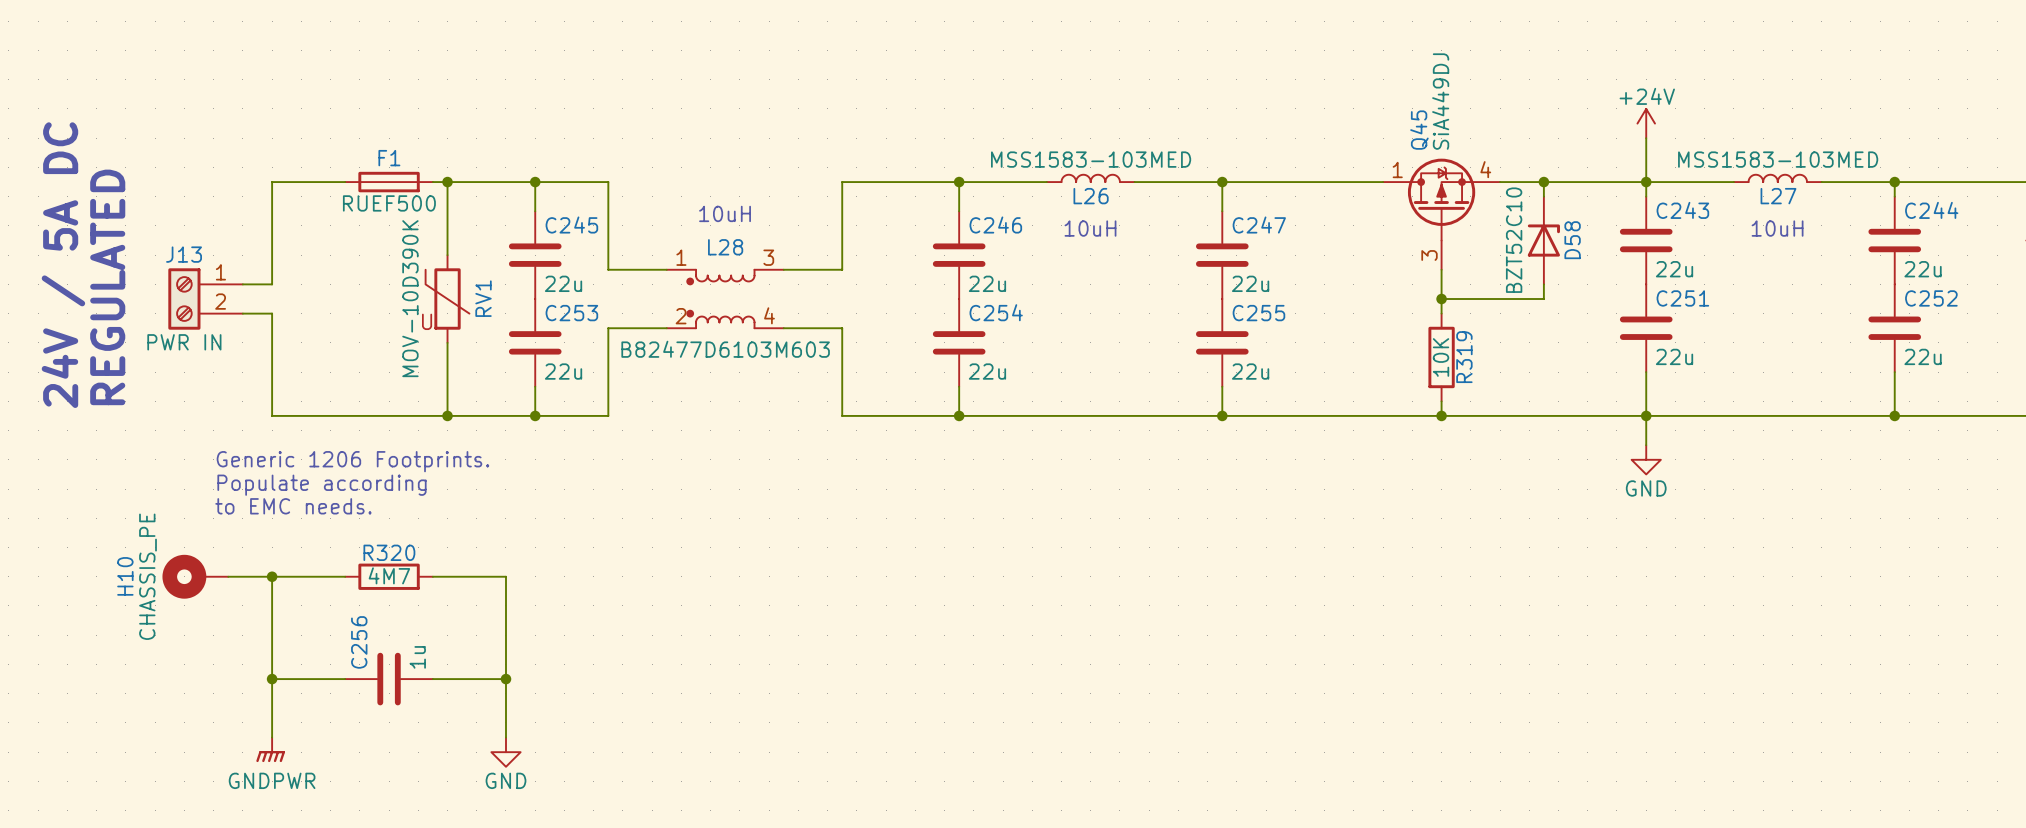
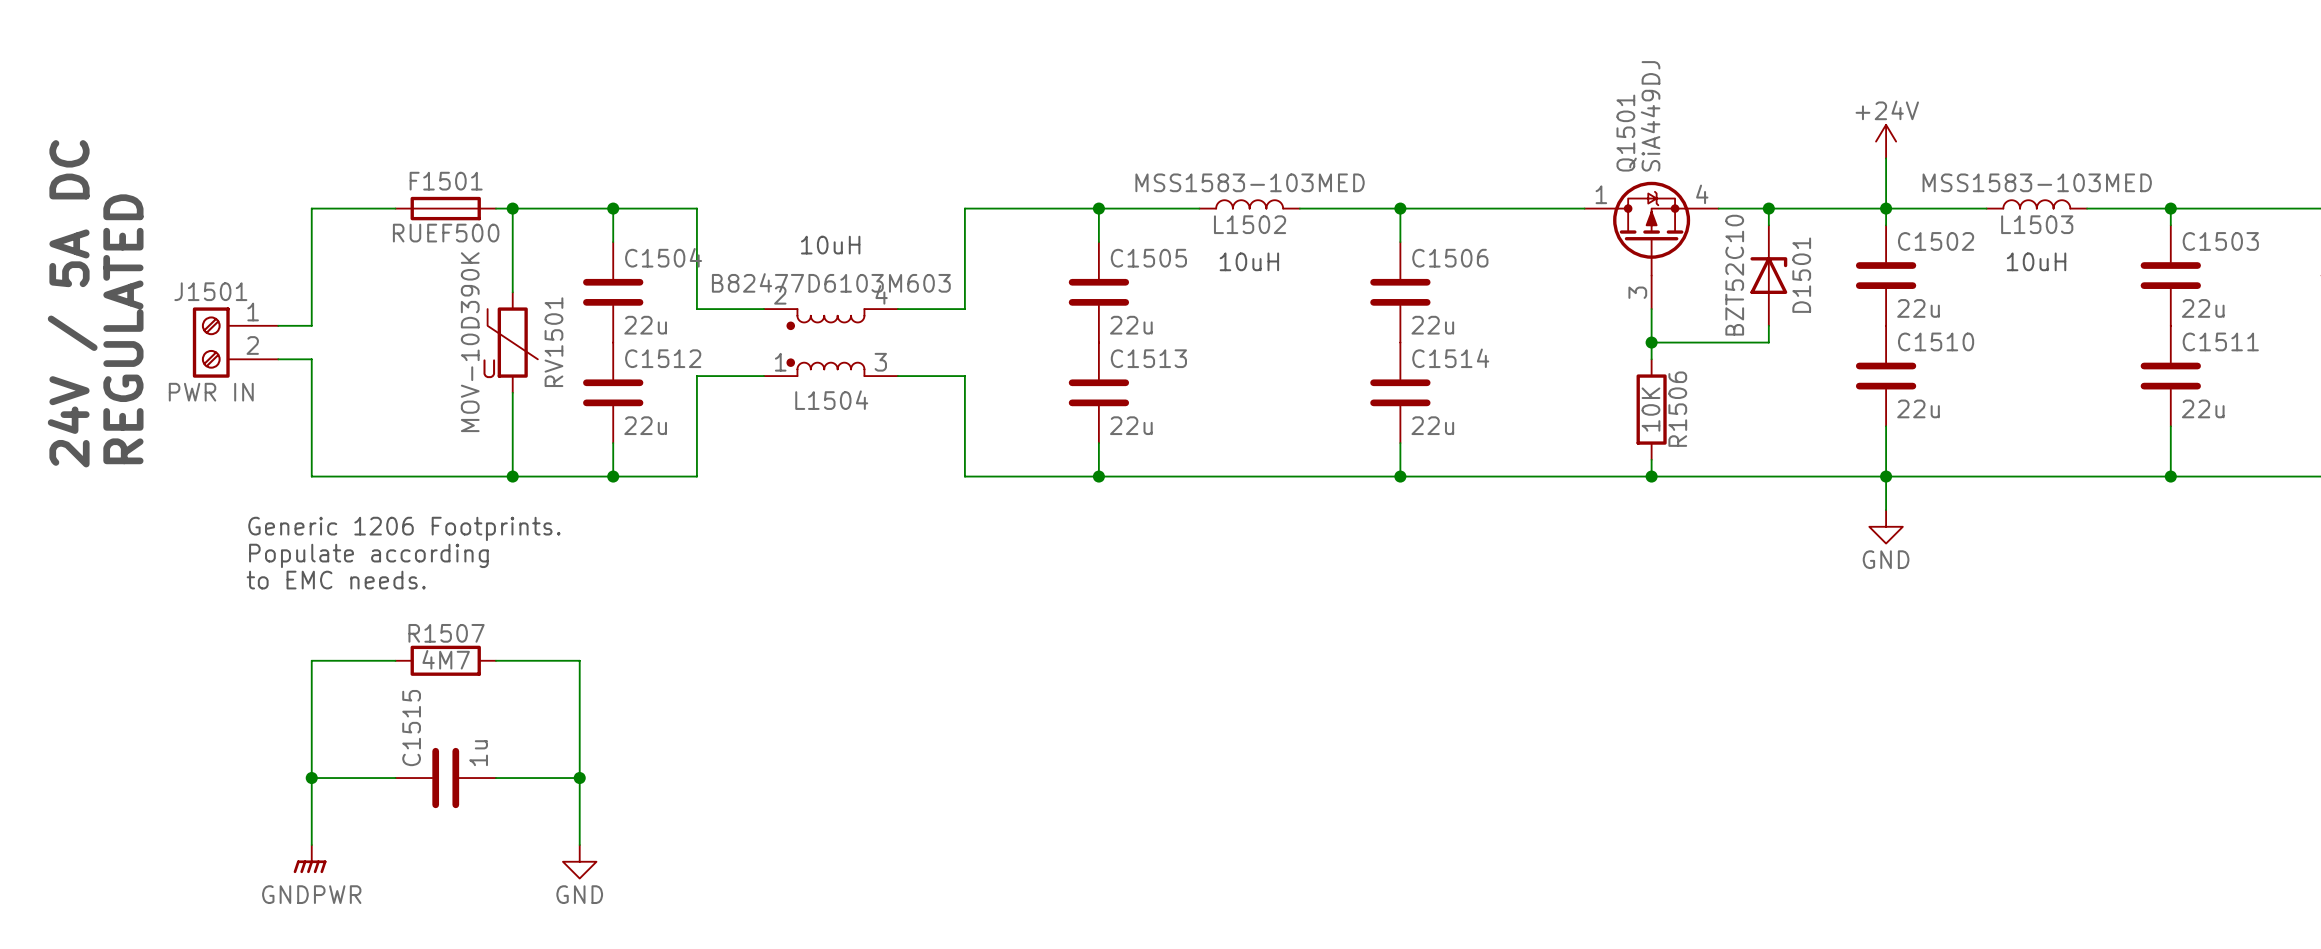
Q45 name: Q45 (1419, 130) -> Q1501 (1626, 133)
F1 name: F1 (389, 158) -> F1501 (446, 181)
L26 name: L26 (1091, 196) -> L1502 (1250, 224)
L27 name: L27 (1778, 196) -> L1503 (2037, 224)
C243 name: C243 (1682, 210) -> C1502 (1936, 241)
C244 name: C244 (1931, 210) -> C1503 (2220, 241)
C245 name: C245 (571, 225) -> C1504 (663, 257)
C246 name: C246 (995, 225) -> C1505 (1148, 258)
C247 name: C247 (1259, 225) -> C1506 (1450, 258)
D58 name: D58 (1572, 240) -> D1501 (1801, 275)
J13 name: J13 (184, 254) -> J1501 (210, 291)
RV1 name: RV1 (483, 298) -> RV1501 (553, 342)
C251 name: C251 (1682, 298) -> C1510 (1936, 341)
C252 name: C252 (1931, 298) -> C1511 (2220, 341)
L28: B82477D6103M603 (725, 299) -> none
L1504: none -> B82477D6103M603 (830, 342)
C254 name: C254 (996, 312) -> C1513 (1148, 358)
C253 name: C253 (571, 313) -> C1512 (663, 358)
C255 name: C255 (1258, 313) -> C1514 (1450, 358)
R319 name: R319 (1464, 357) -> R1506 (1677, 409)
R320 name: R320 (389, 552) -> R1507 (446, 633)
H10: CHASSIS_PE (195, 576) -> none
wire: (228, 576) (272, 576) -> none
junction: (272, 576) -> none
C256 name: C256 (359, 642) -> C1515 (411, 728)

